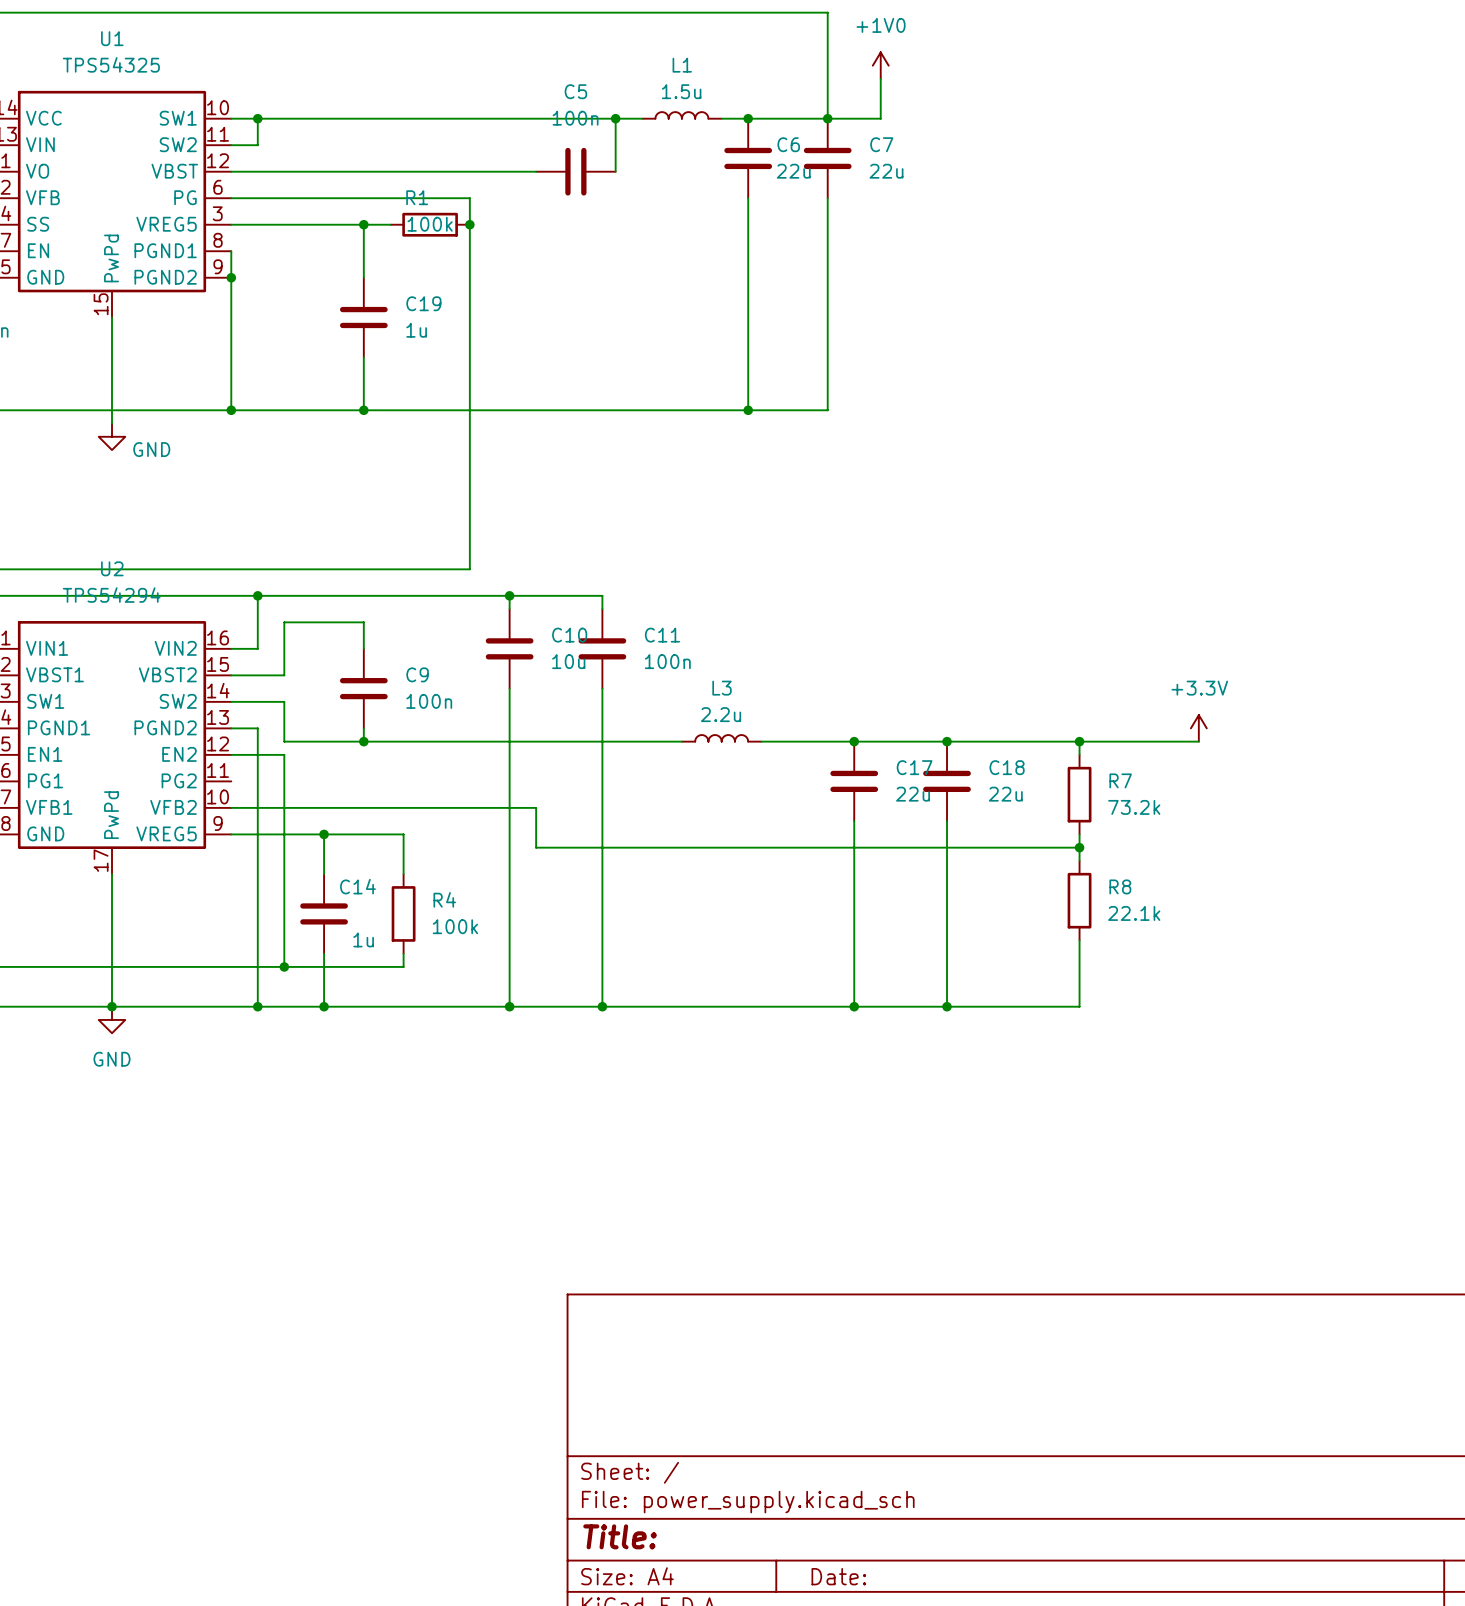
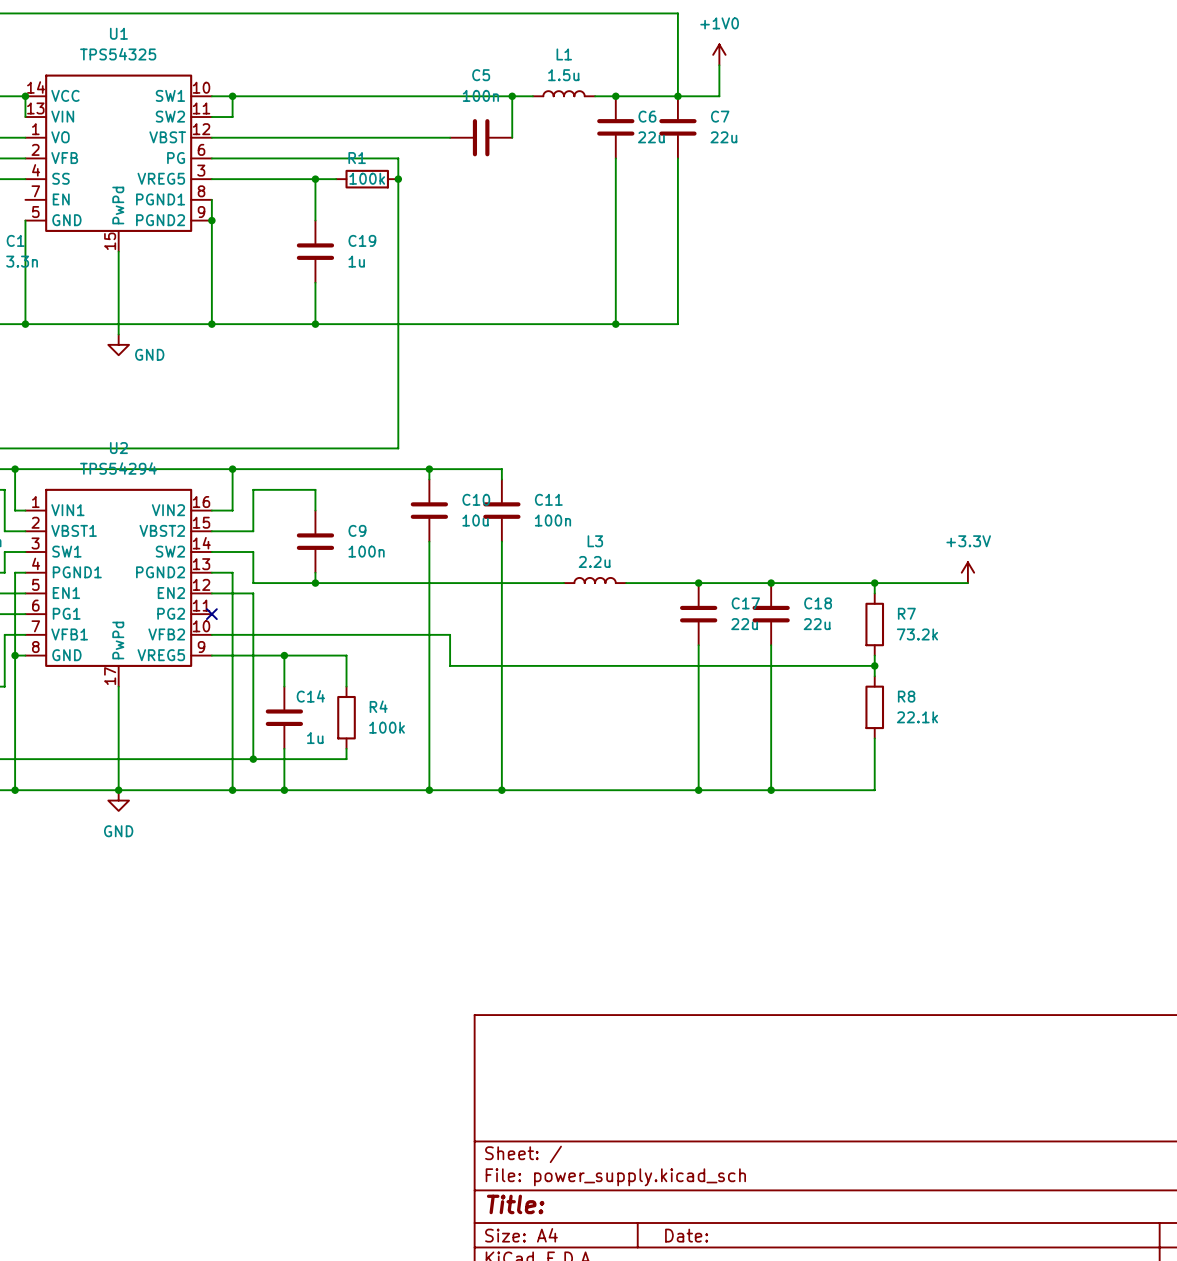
no-connect mark: none -> (211, 614)

